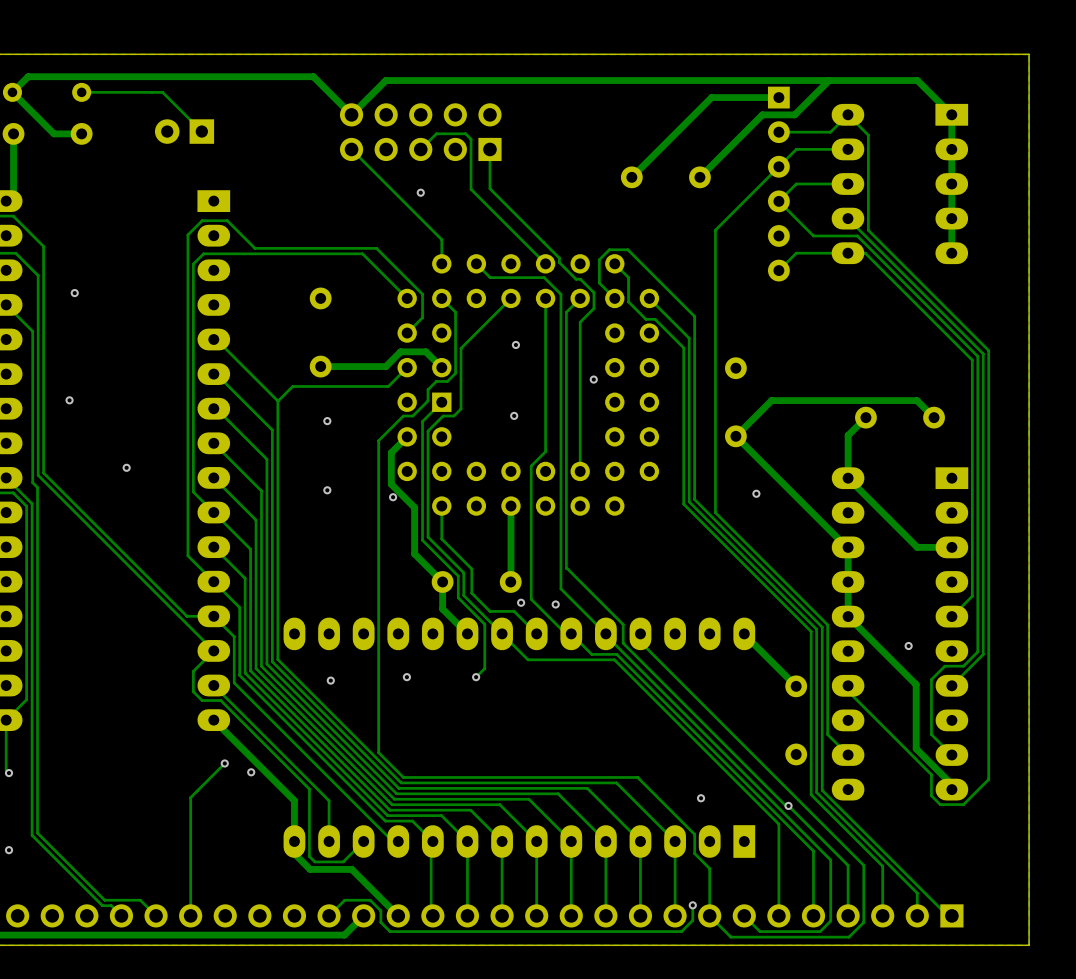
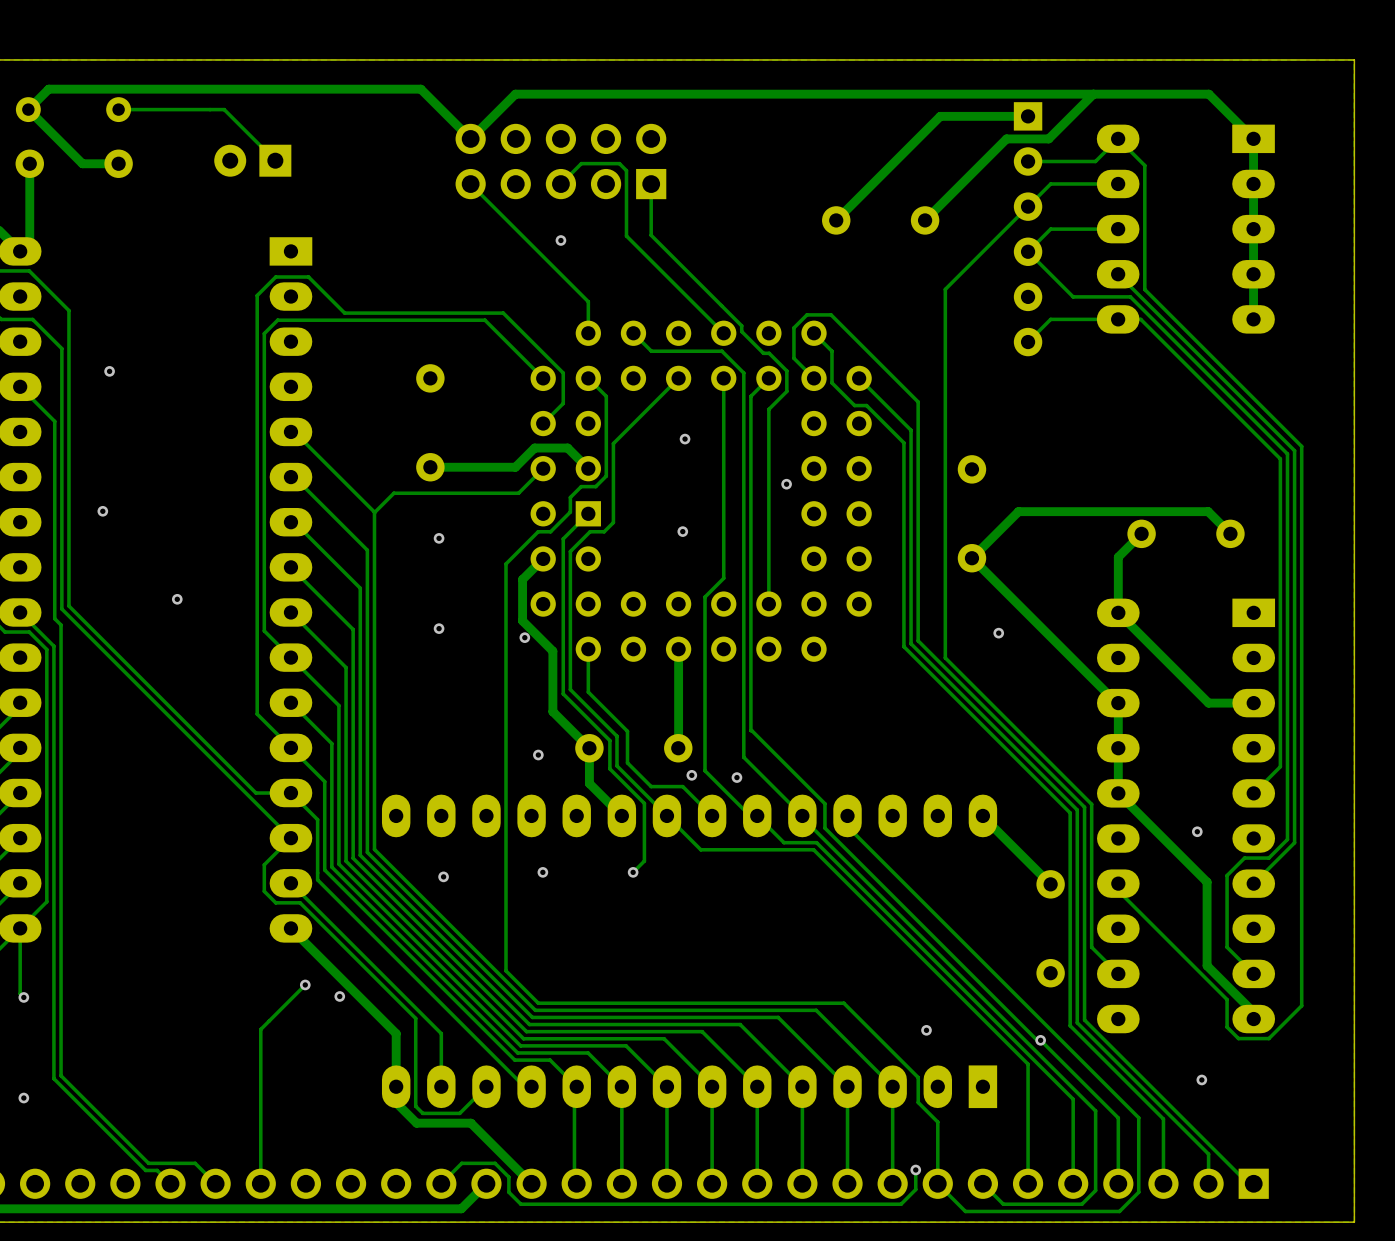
via: none -> (538, 755)
via: none -> (1201, 1079)

